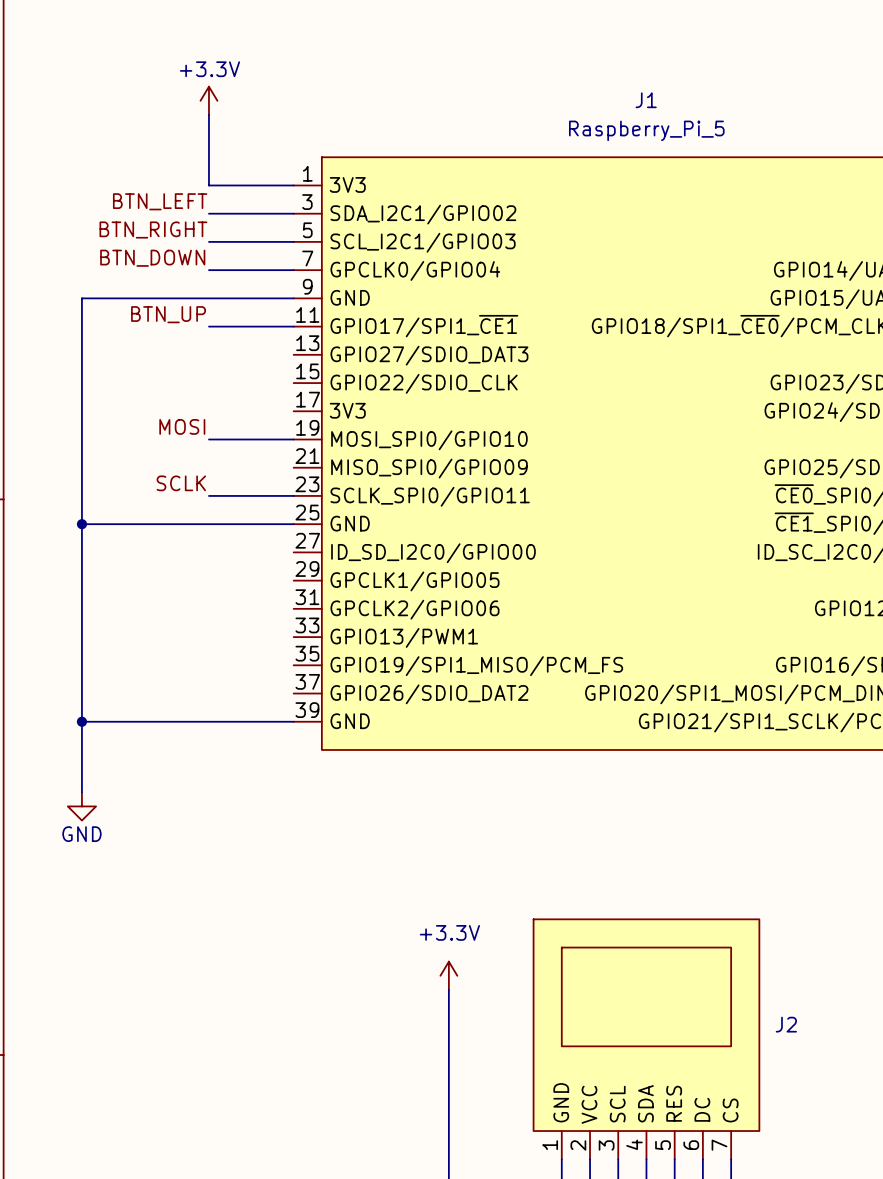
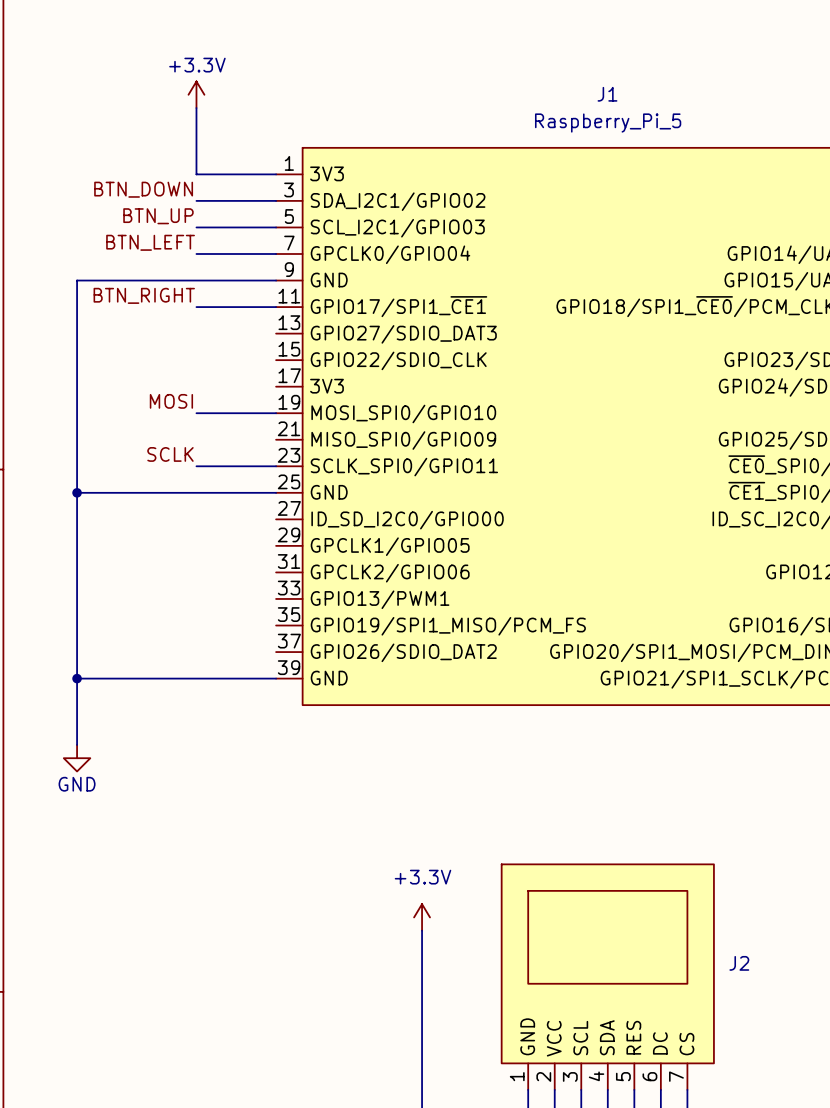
label: BTN_LEFT (160, 201) -> BTN_DOWN (143, 189)
label: BTN_RIGHT (153, 230) -> BTN_UP (158, 216)
label: BTN_DOWN (152, 258) -> BTN_LEFT (150, 242)
label: BTN_UP (168, 314) -> BTN_RIGHT (144, 295)

